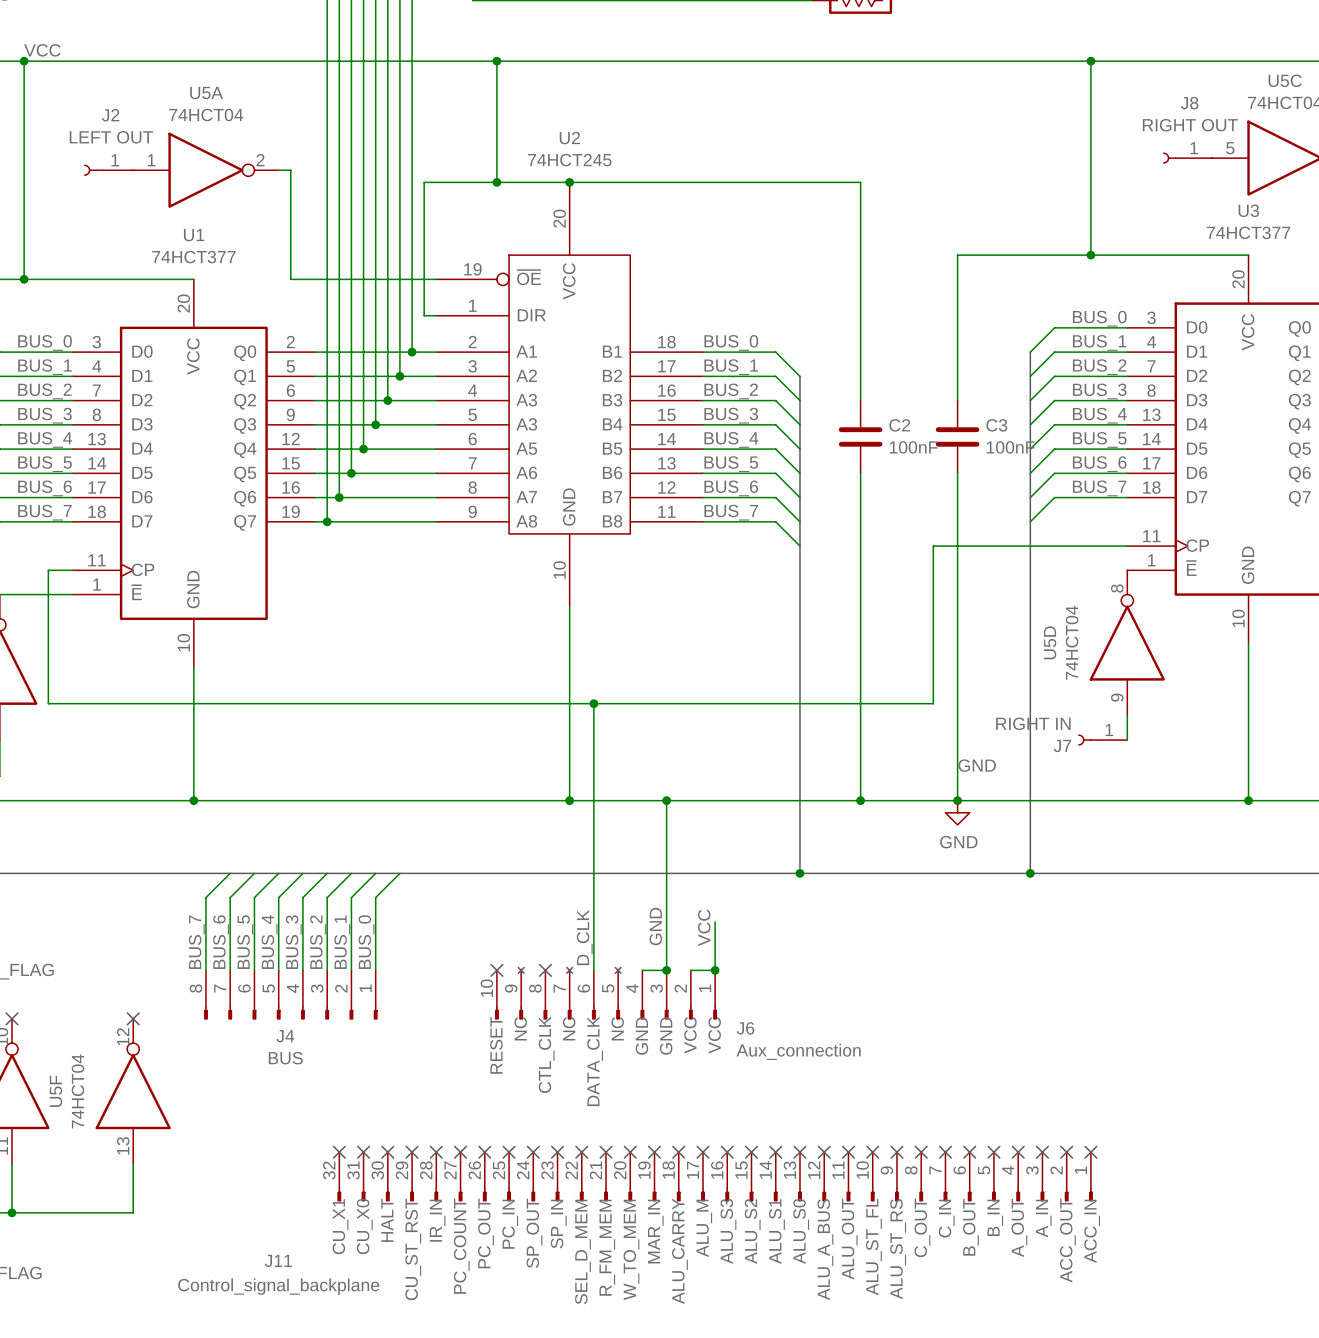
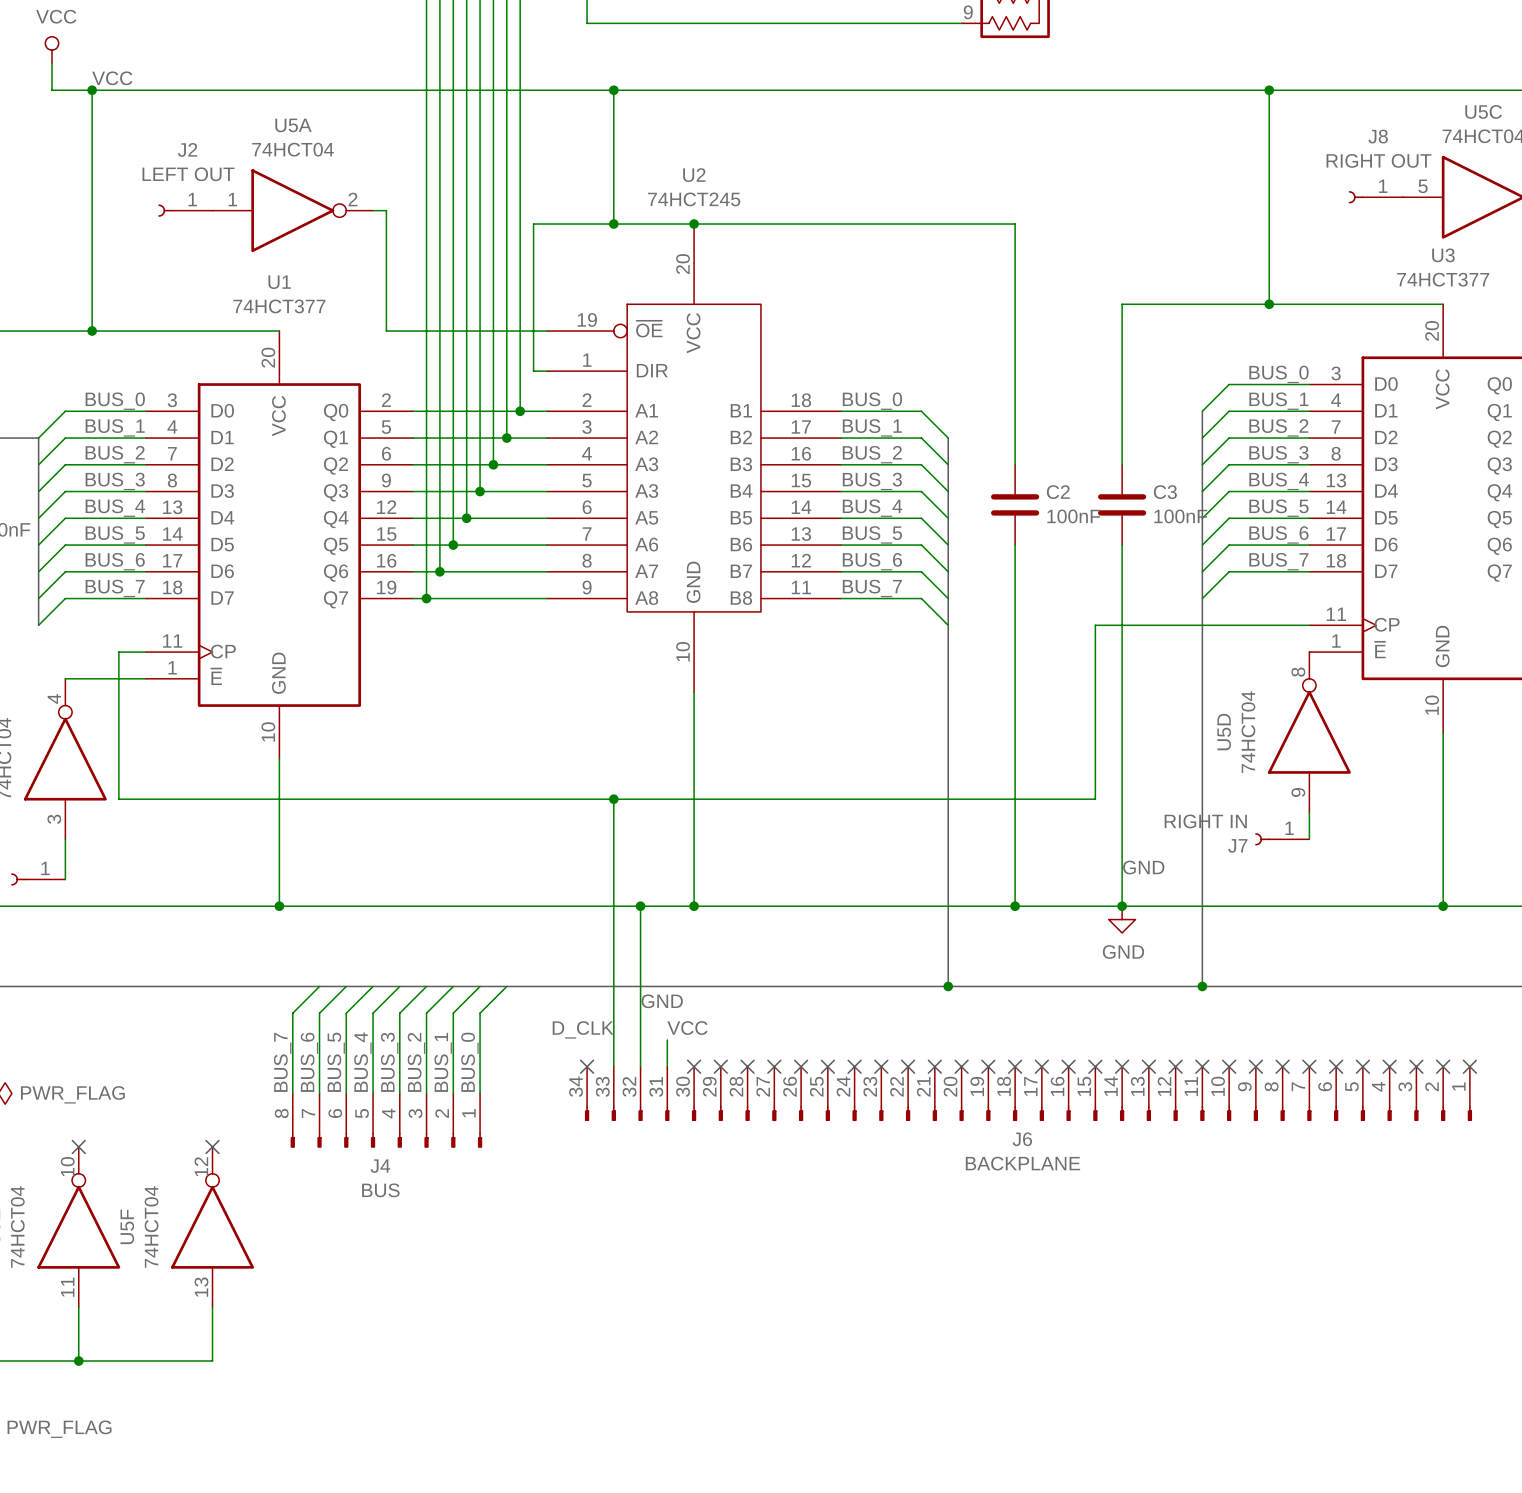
wire: none -> (613, 799) (613, 1066)
junction: none -> (613, 799)
wire: (593, 703) (593, 970) -> none
junction: (593, 703) -> none
wire: none -> (640, 906) (640, 1066)
junction: none -> (640, 906)
wire: (666, 800) (666, 970) (642, 970) -> none
junction: (666, 800) -> none
wire: none -> (667, 1039) (667, 1066)
wire: (715, 921) (715, 970) (690, 970) -> none
label rotation: 0° (655, 926) -> 90° clockwise (662, 1001)
label position: GND (655, 926) -> GND (662, 1001)
label rotation: 0° (704, 927) -> 90° clockwise (687, 1028)
label position: VCC (704, 927) -> VCC (687, 1028)
label rotation: 0° (584, 937) -> 90° clockwise (583, 1029)
label position: D_CLK (584, 937) -> D_CLK (583, 1029)
no-connect mark: none -> (694, 1066)
no-connect mark: none -> (720, 1066)
no-connect mark: none -> (747, 1066)
no-connect mark: none -> (774, 1066)
no-connect mark: none -> (801, 1066)
no-connect mark: none -> (827, 1066)
no-connect mark: none -> (854, 1066)
no-connect mark: none -> (881, 1066)
no-connect mark: none -> (908, 1066)
no-connect mark: none -> (934, 1066)
no-connect mark: none -> (961, 1066)
no-connect mark: none -> (988, 1066)
no-connect mark: none -> (1015, 1066)
no-connect mark: none -> (1041, 1066)
no-connect mark: none -> (1068, 1066)
no-connect mark: none -> (1095, 1066)
no-connect mark: none -> (1122, 1066)
no-connect mark: none -> (1148, 1066)
no-connect mark: none -> (1175, 1066)
no-connect mark: none -> (1202, 1066)
no-connect mark: none -> (1229, 1066)
no-connect mark: none -> (1255, 1066)
no-connect mark: none -> (1282, 1066)
no-connect mark: none -> (1309, 1066)
no-connect mark: none -> (1336, 1066)
no-connect mark: none -> (1362, 1066)
no-connect mark: none -> (1389, 1066)
no-connect mark: none -> (1416, 1066)
no-connect mark: none -> (1443, 1066)
no-connect mark: none -> (1469, 1066)
J6 symbol: [494, 967, 718, 1020] -> [584, 1066, 1473, 1122]
no-connect mark position: (496, 970) -> (587, 1066)
no-connect mark: (545, 970) -> none
junction: (666, 970) -> none
junction: (715, 970) -> none
J6 name position: J6 (745, 1028) -> J6 (1022, 1139)
J6 value: Aux_connection (798, 1051) -> BACKPLANE (1022, 1163)
no-connect mark: (339, 1152) -> none
no-connect mark: (363, 1152) -> none
no-connect mark: (387, 1152) -> none
no-connect mark: (412, 1152) -> none
no-connect mark: (436, 1152) -> none
no-connect mark: (460, 1152) -> none
no-connect mark: (484, 1152) -> none
no-connect mark: (509, 1152) -> none
no-connect mark: (533, 1152) -> none
no-connect mark: (557, 1152) -> none
no-connect mark: (581, 1152) -> none
no-connect mark: (606, 1152) -> none
no-connect mark: (630, 1152) -> none
no-connect mark: (654, 1152) -> none
no-connect mark: (678, 1152) -> none
no-connect mark: (703, 1152) -> none
no-connect mark: (727, 1152) -> none
no-connect mark: (751, 1152) -> none
no-connect mark: (775, 1152) -> none
no-connect mark: (799, 1152) -> none
no-connect mark: (824, 1152) -> none
no-connect mark: (848, 1152) -> none
no-connect mark: (872, 1152) -> none
no-connect mark: (896, 1152) -> none
no-connect mark: (921, 1152) -> none
no-connect mark: (945, 1152) -> none
no-connect mark: (969, 1152) -> none
no-connect mark: (993, 1152) -> none
no-connect mark: (1018, 1152) -> none
no-connect mark: (1042, 1152) -> none
no-connect mark: (1066, 1152) -> none
no-connect mark: (1090, 1152) -> none
J11: Control_signal_backplane (715, 1176) -> none

